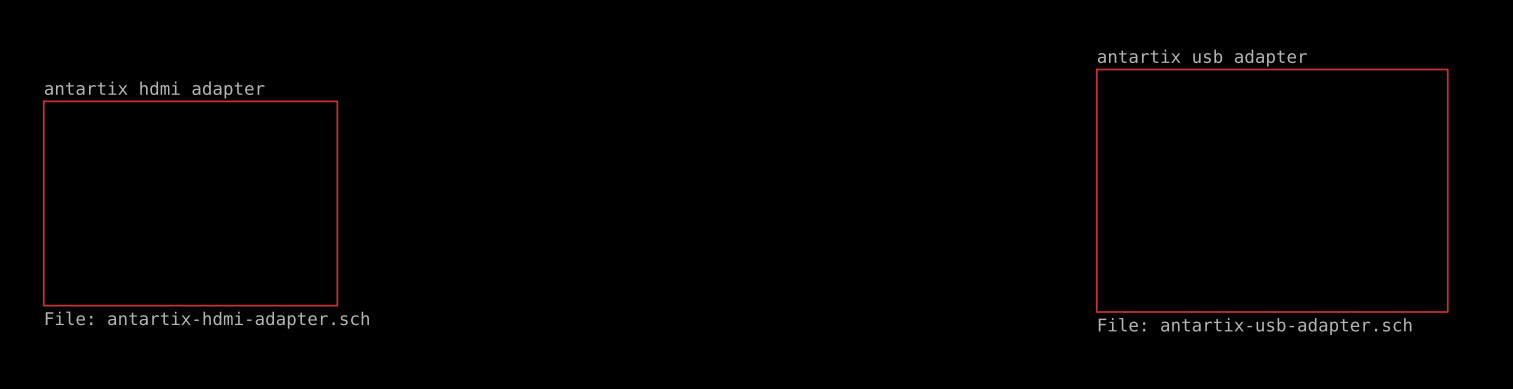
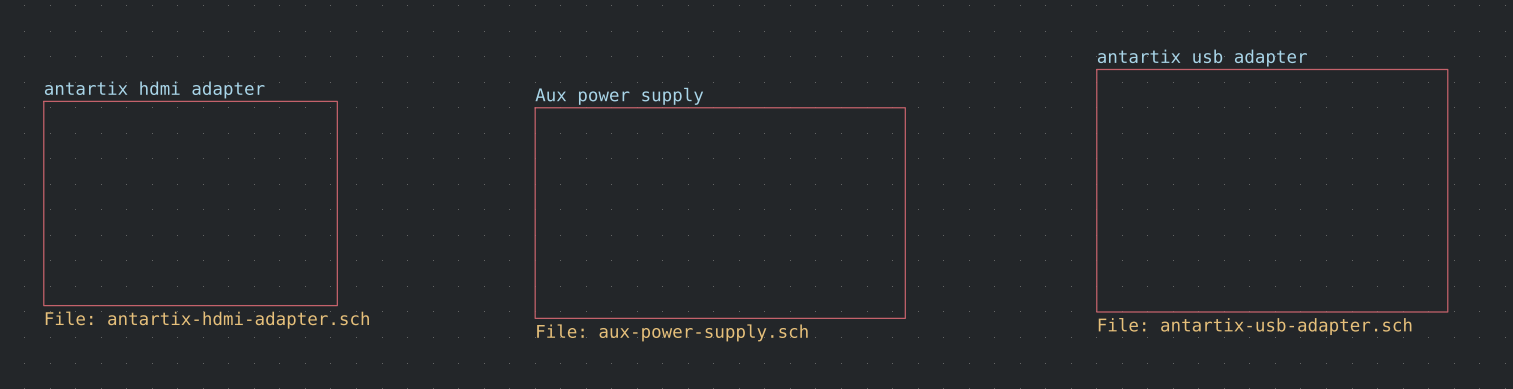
sheet Aux power supply: none -> File: aux-power-supply.sch (720, 213)

